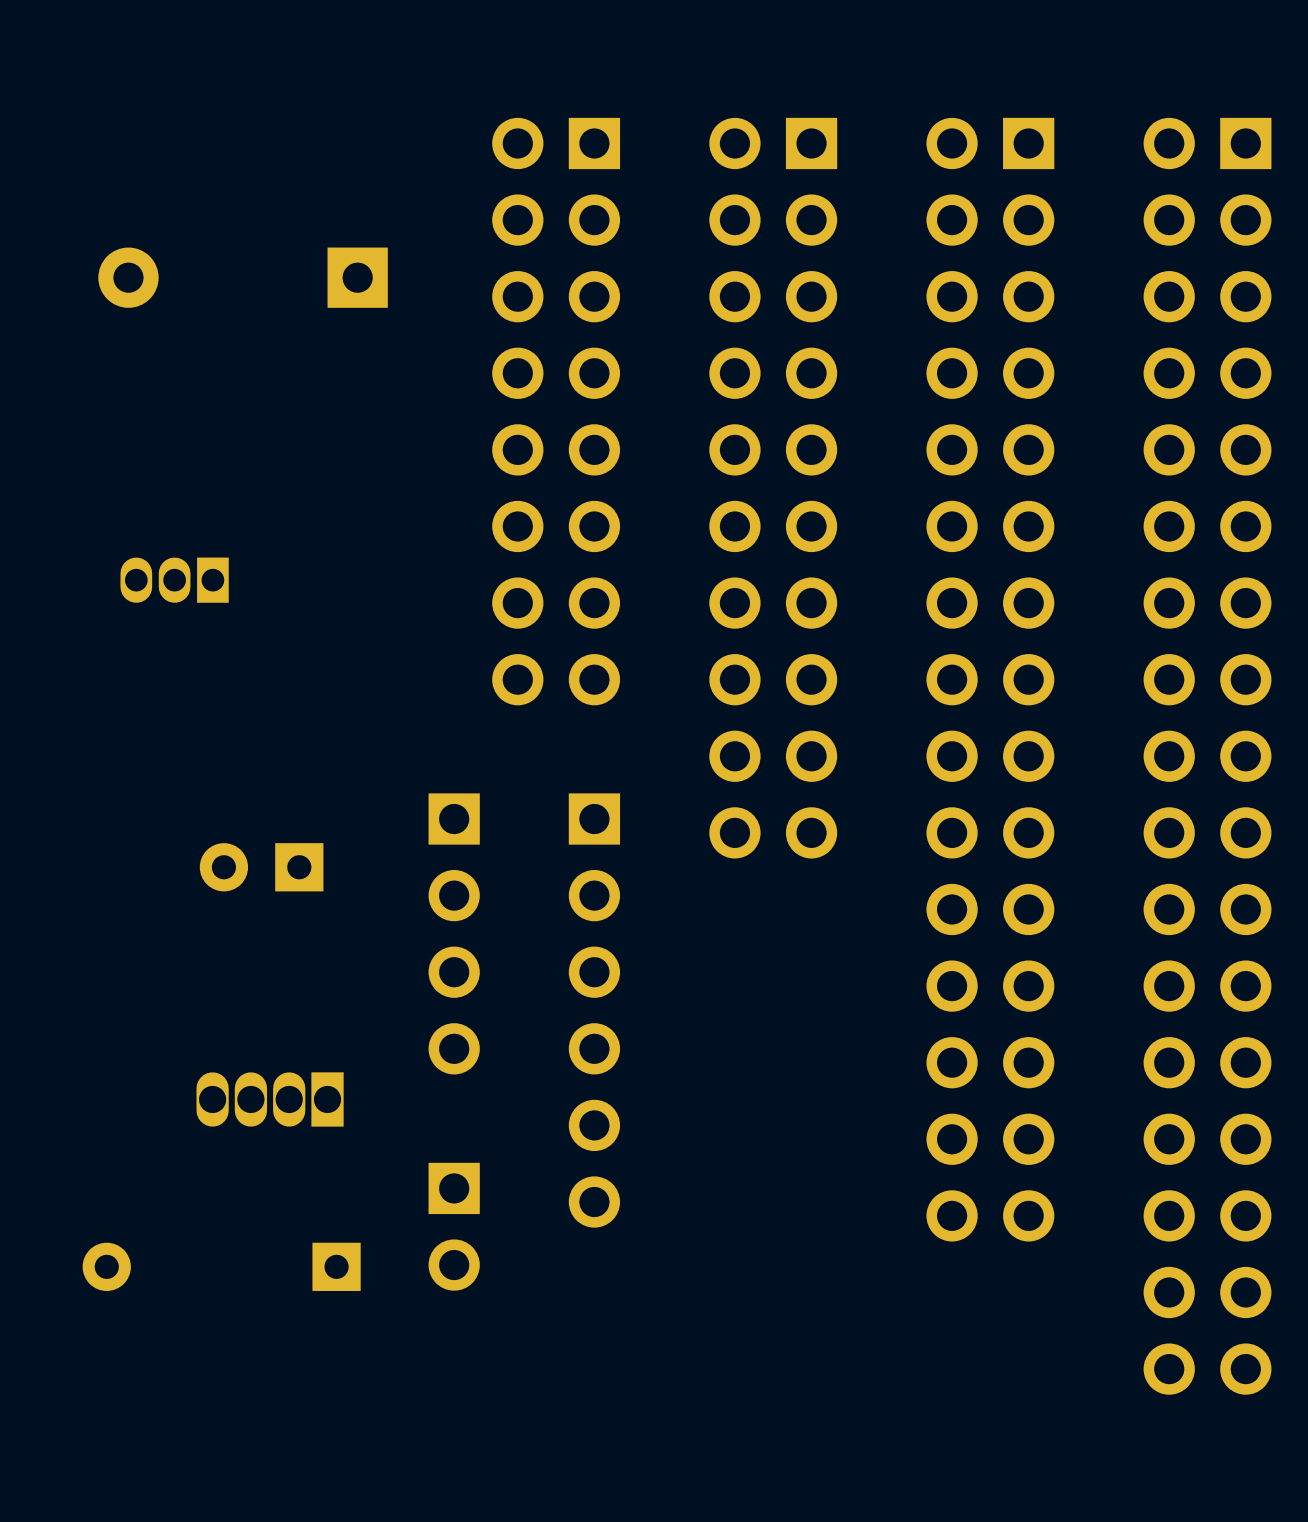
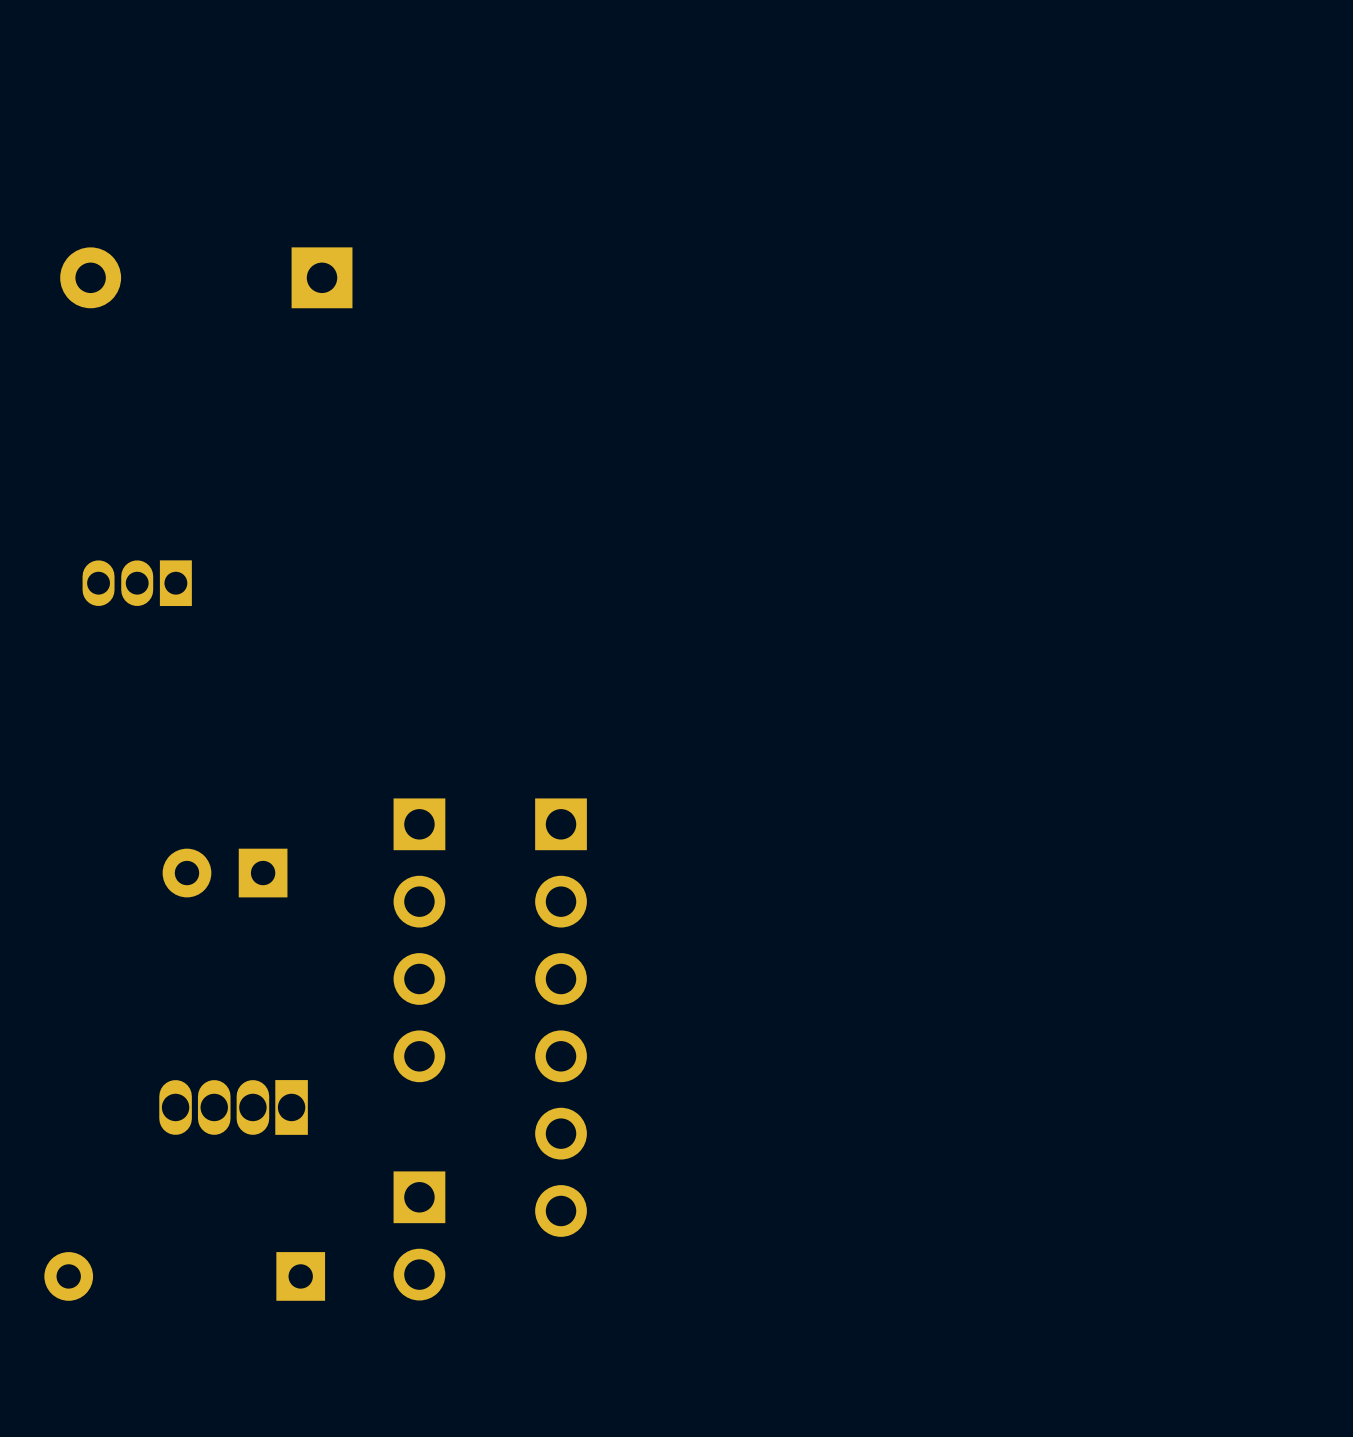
part: (556, 411) -> none
part: (773, 488) -> none
part: (990, 679) -> none
part: (1207, 756) -> none

